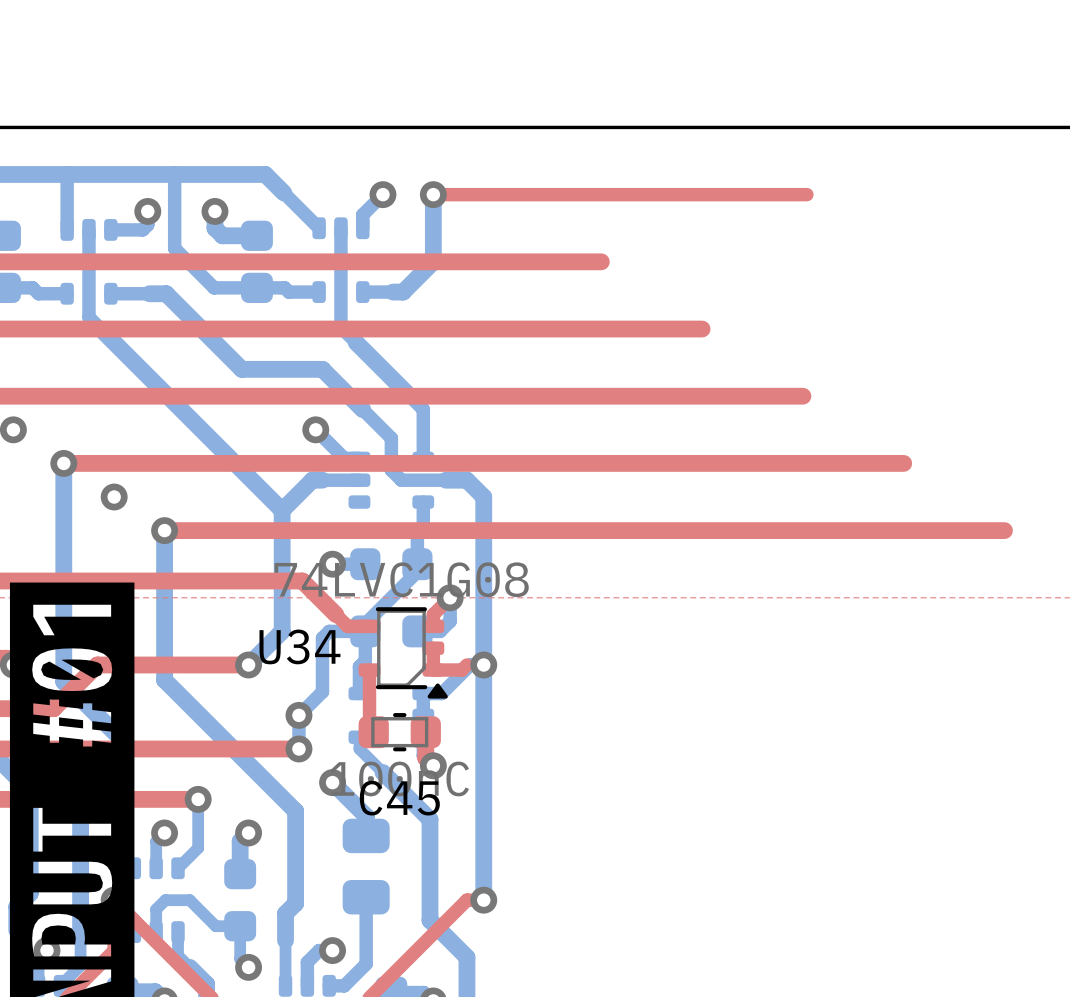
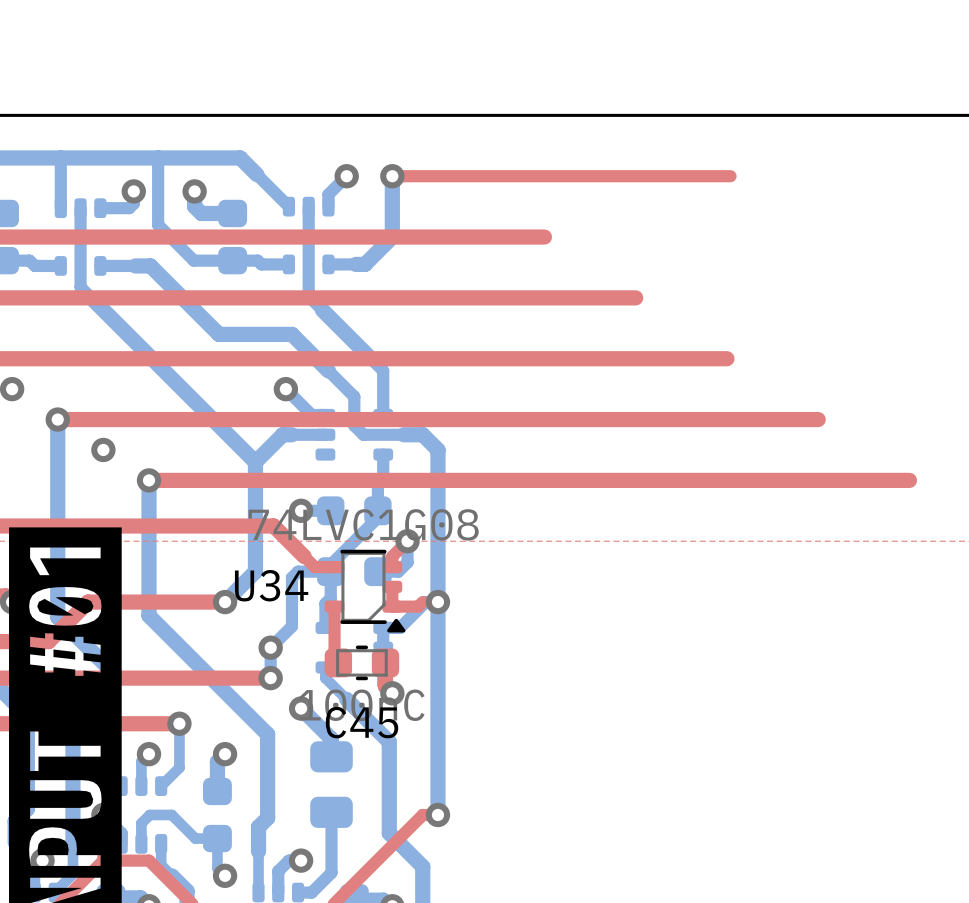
top track: (114, 900) (164, 950) -> (103, 860) (149, 860)

